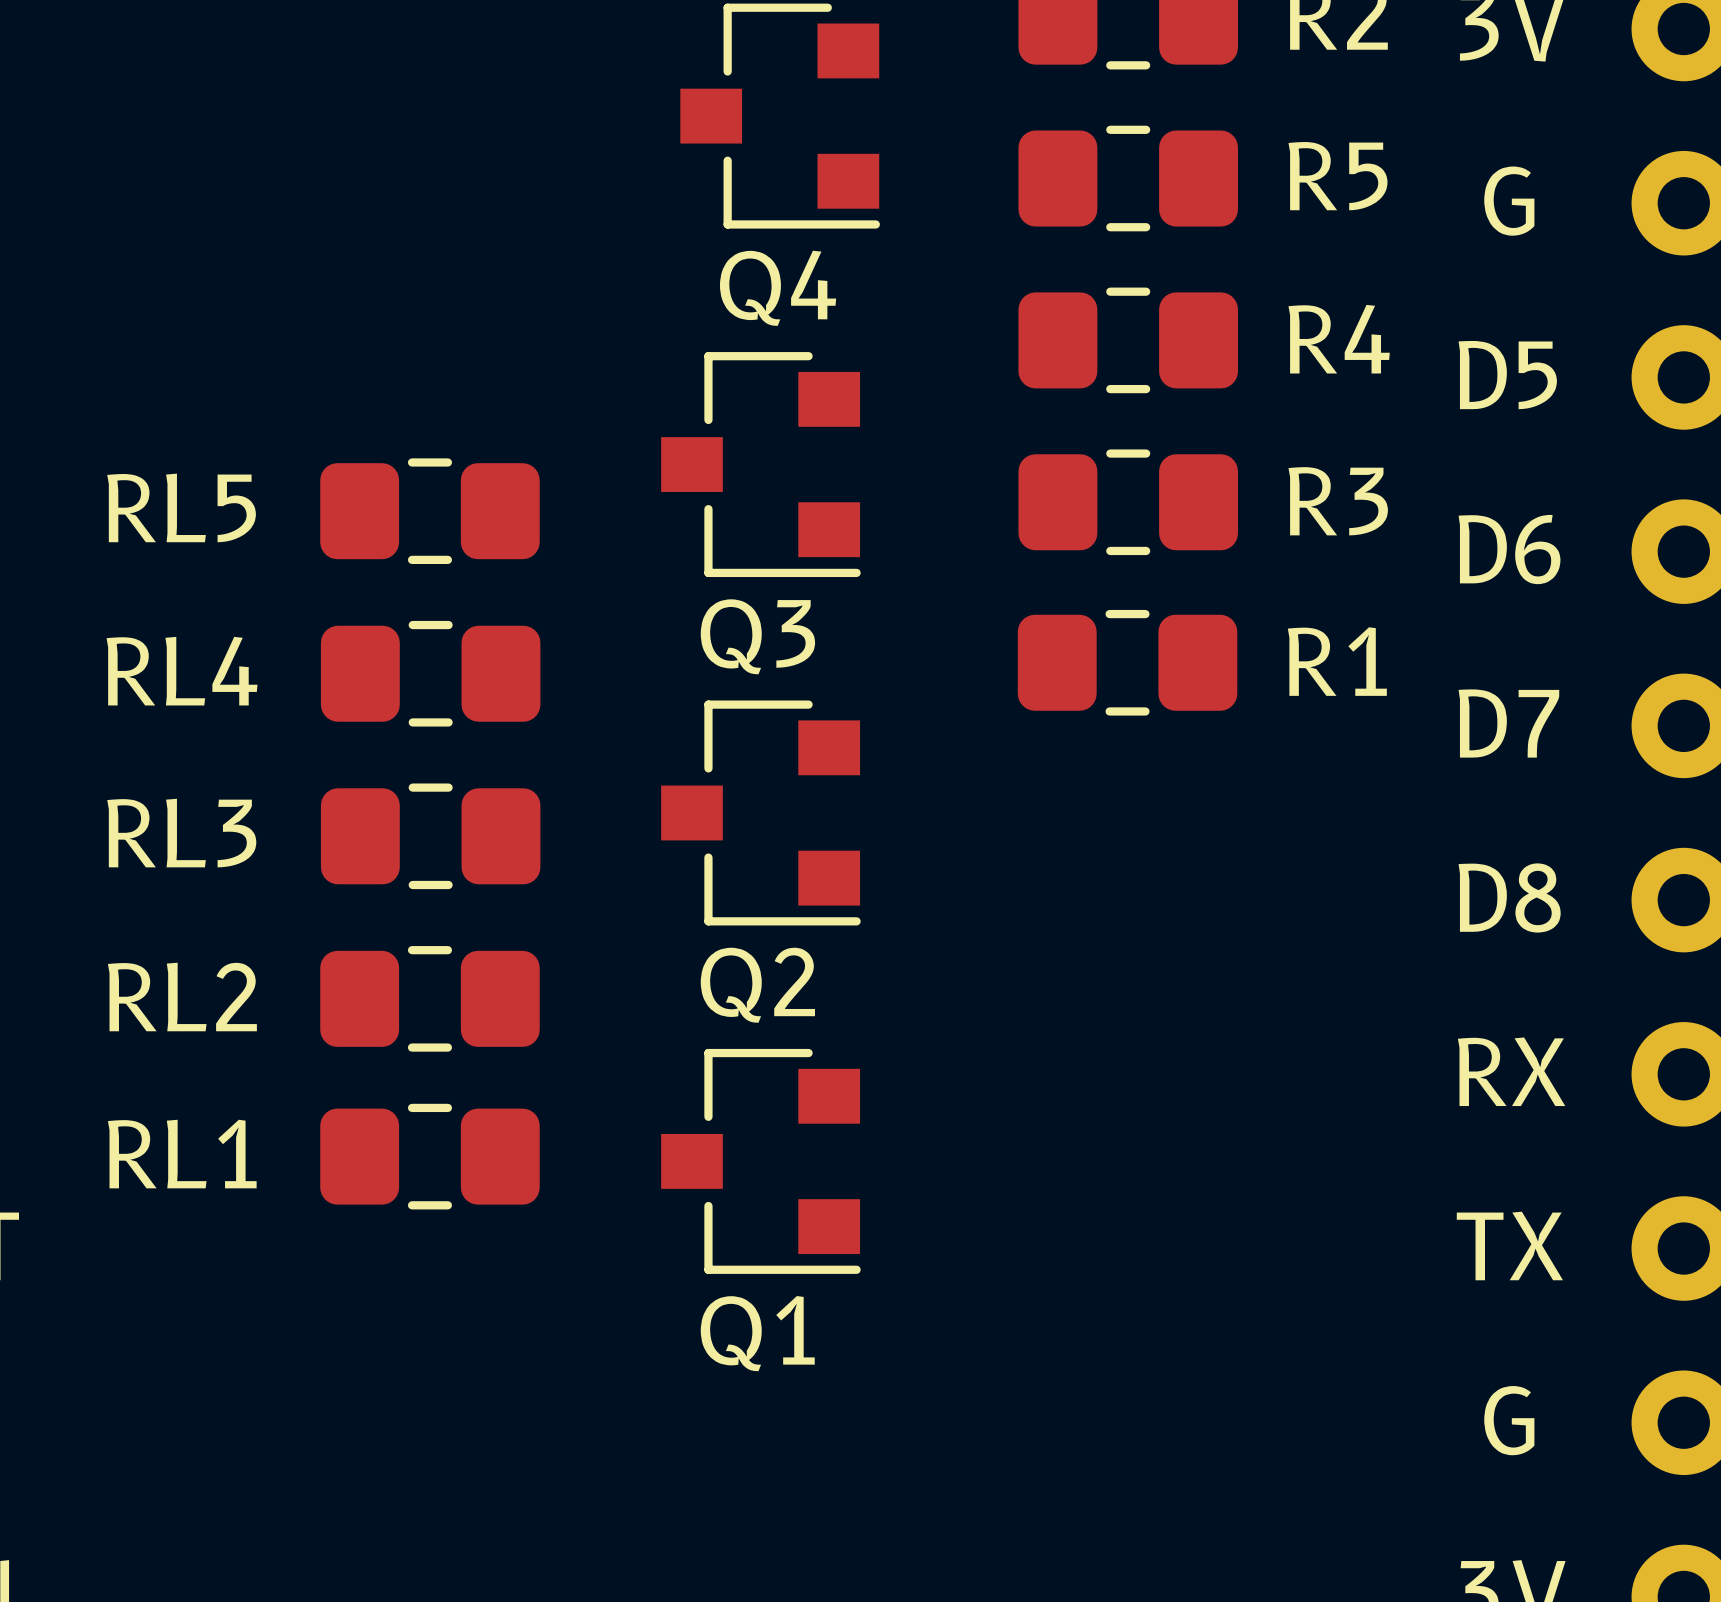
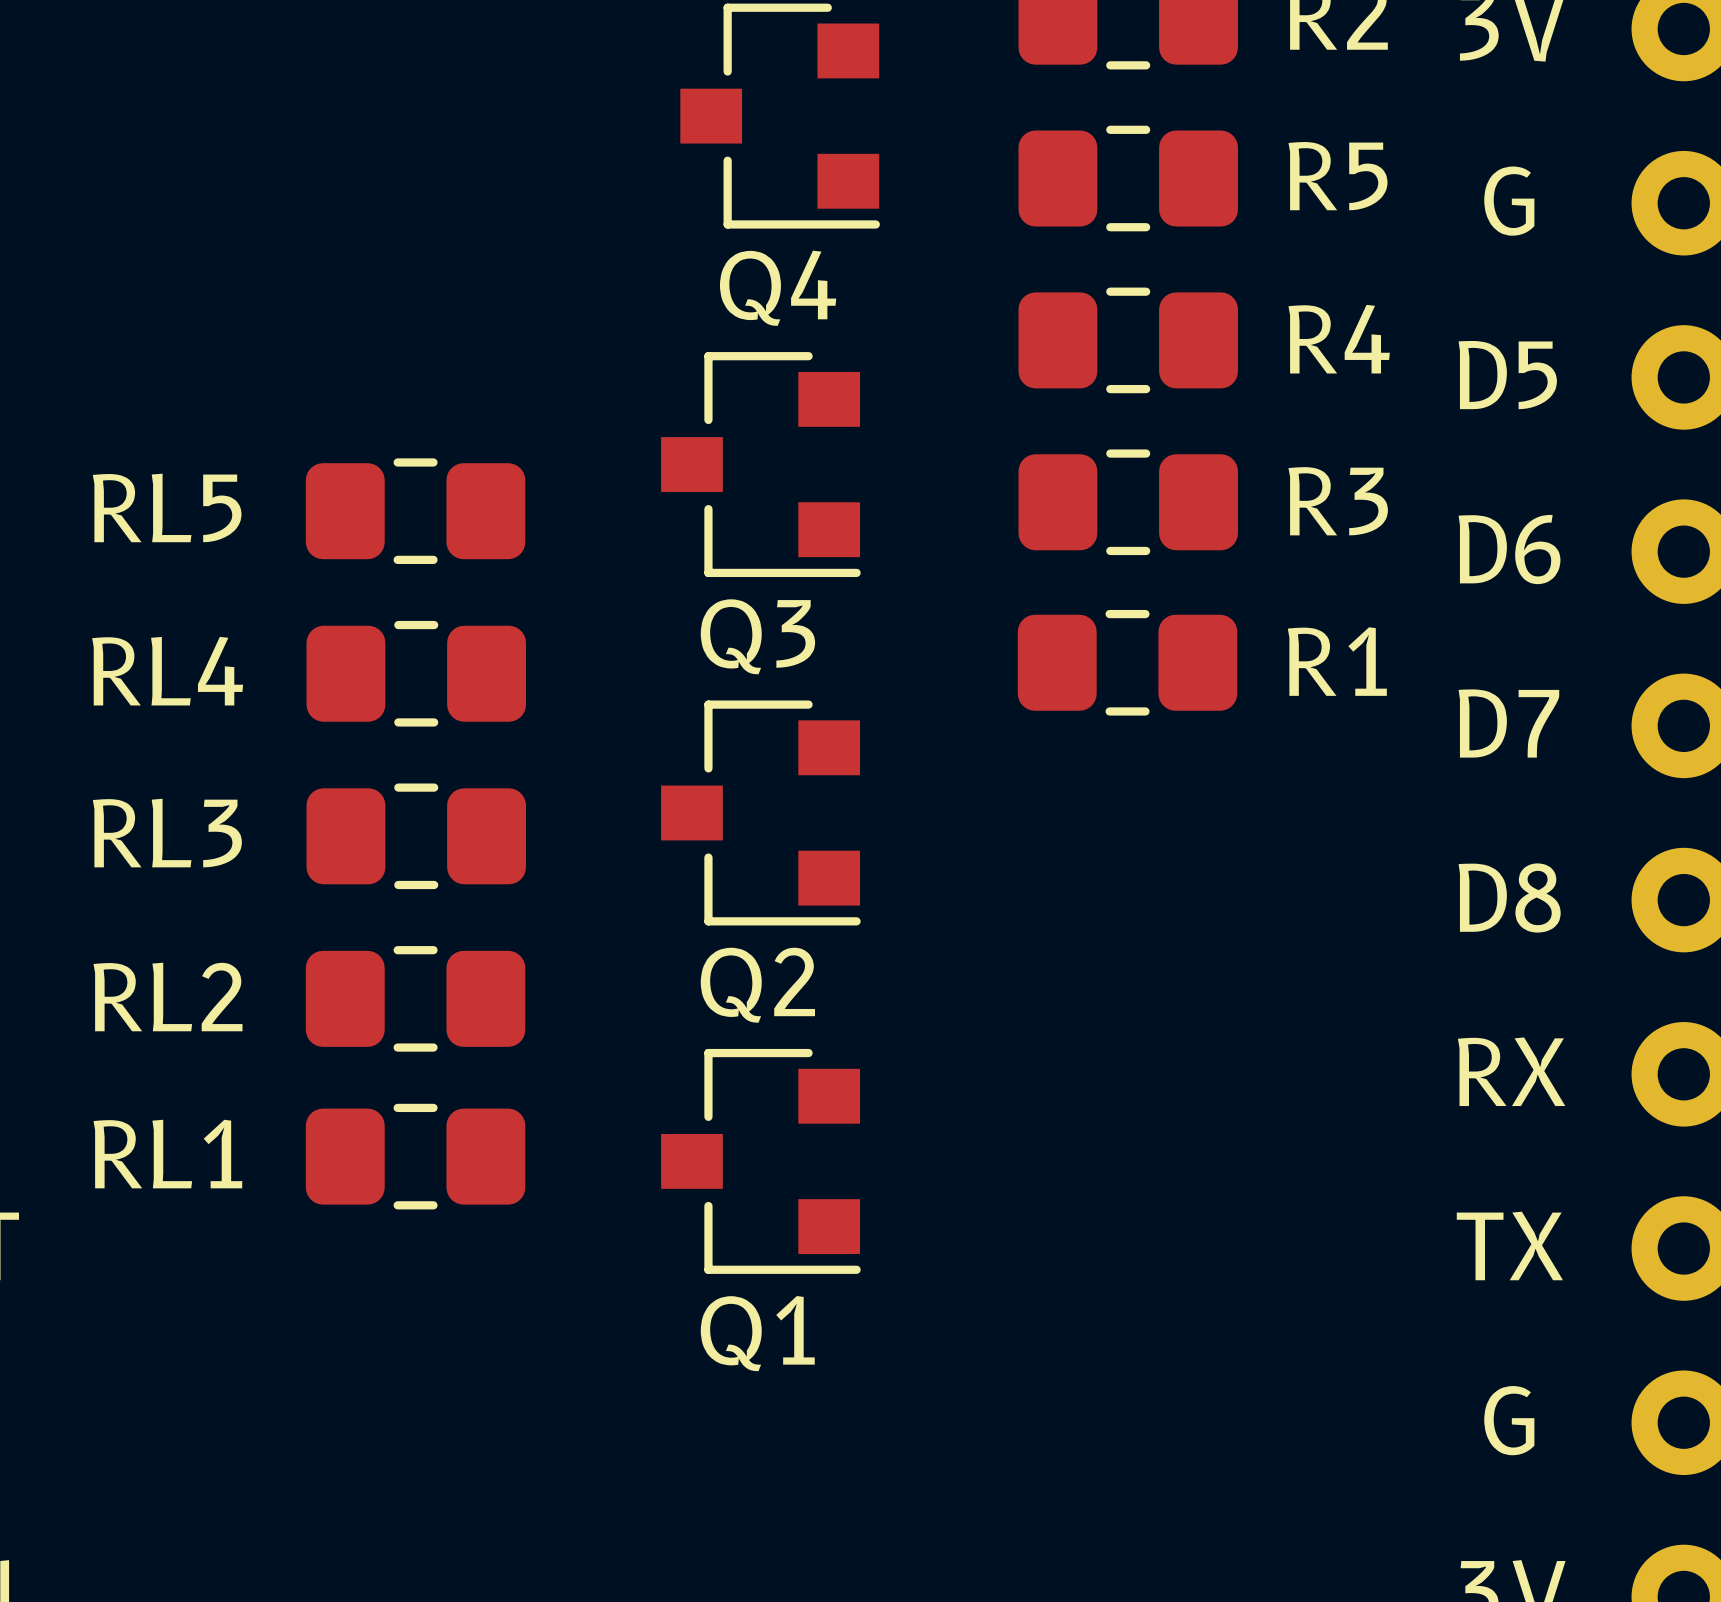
RL5 position: (429, 511) -> (415, 511)
RL4 position: (430, 673) -> (416, 673)
RL3 position: (430, 836) -> (416, 836)
RL2 position: (429, 998) -> (415, 998)
RL1 position: (429, 1156) -> (415, 1156)

